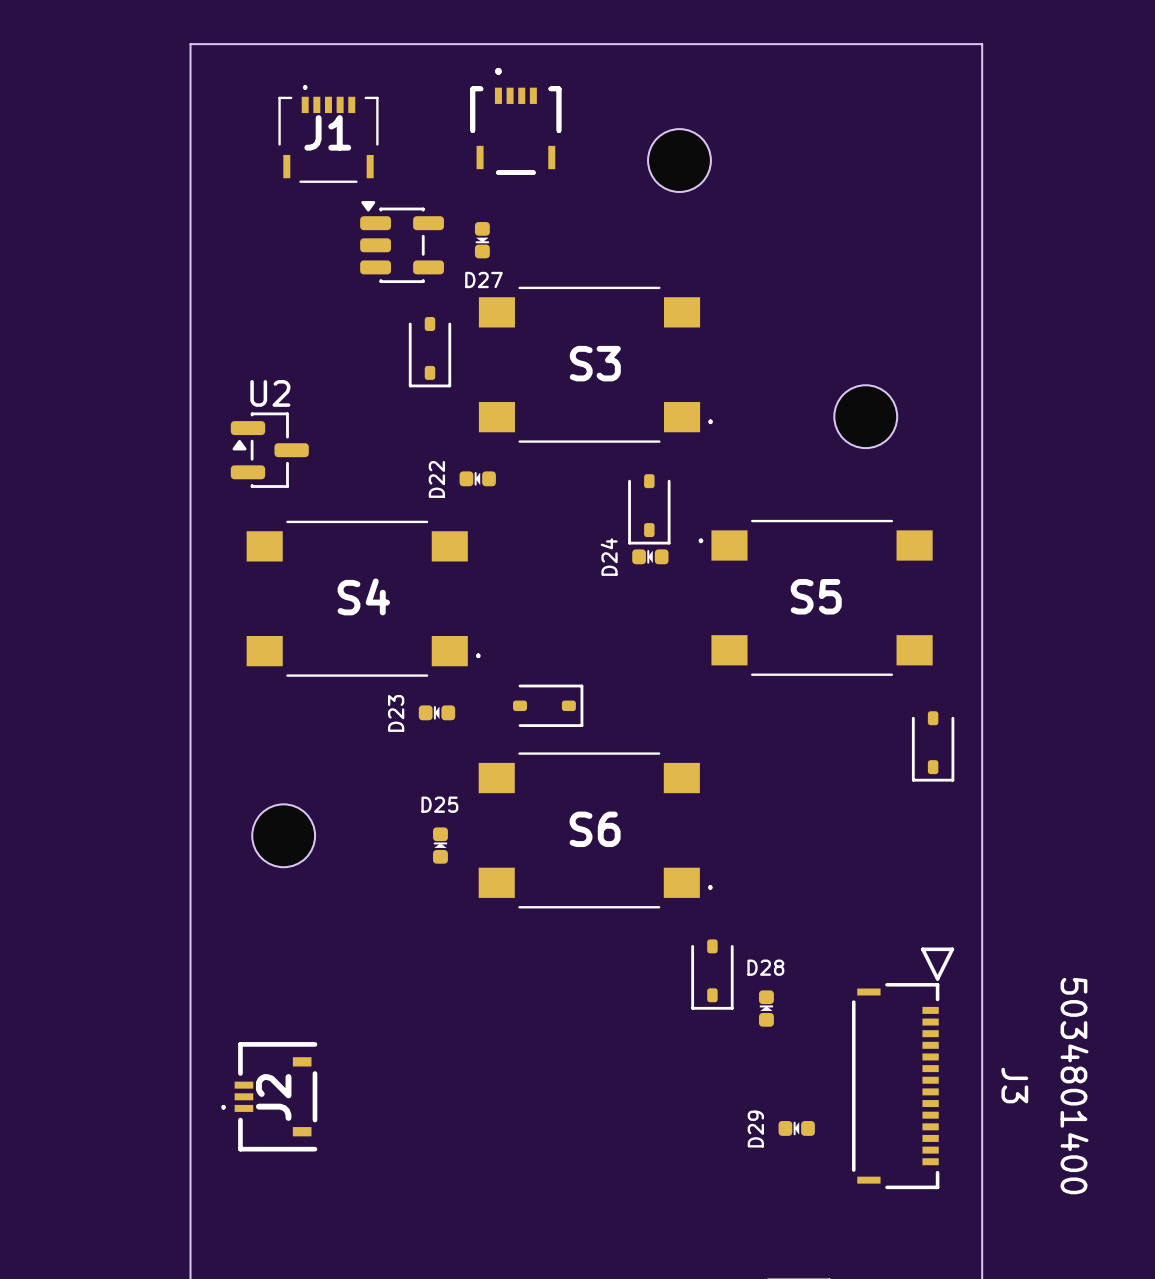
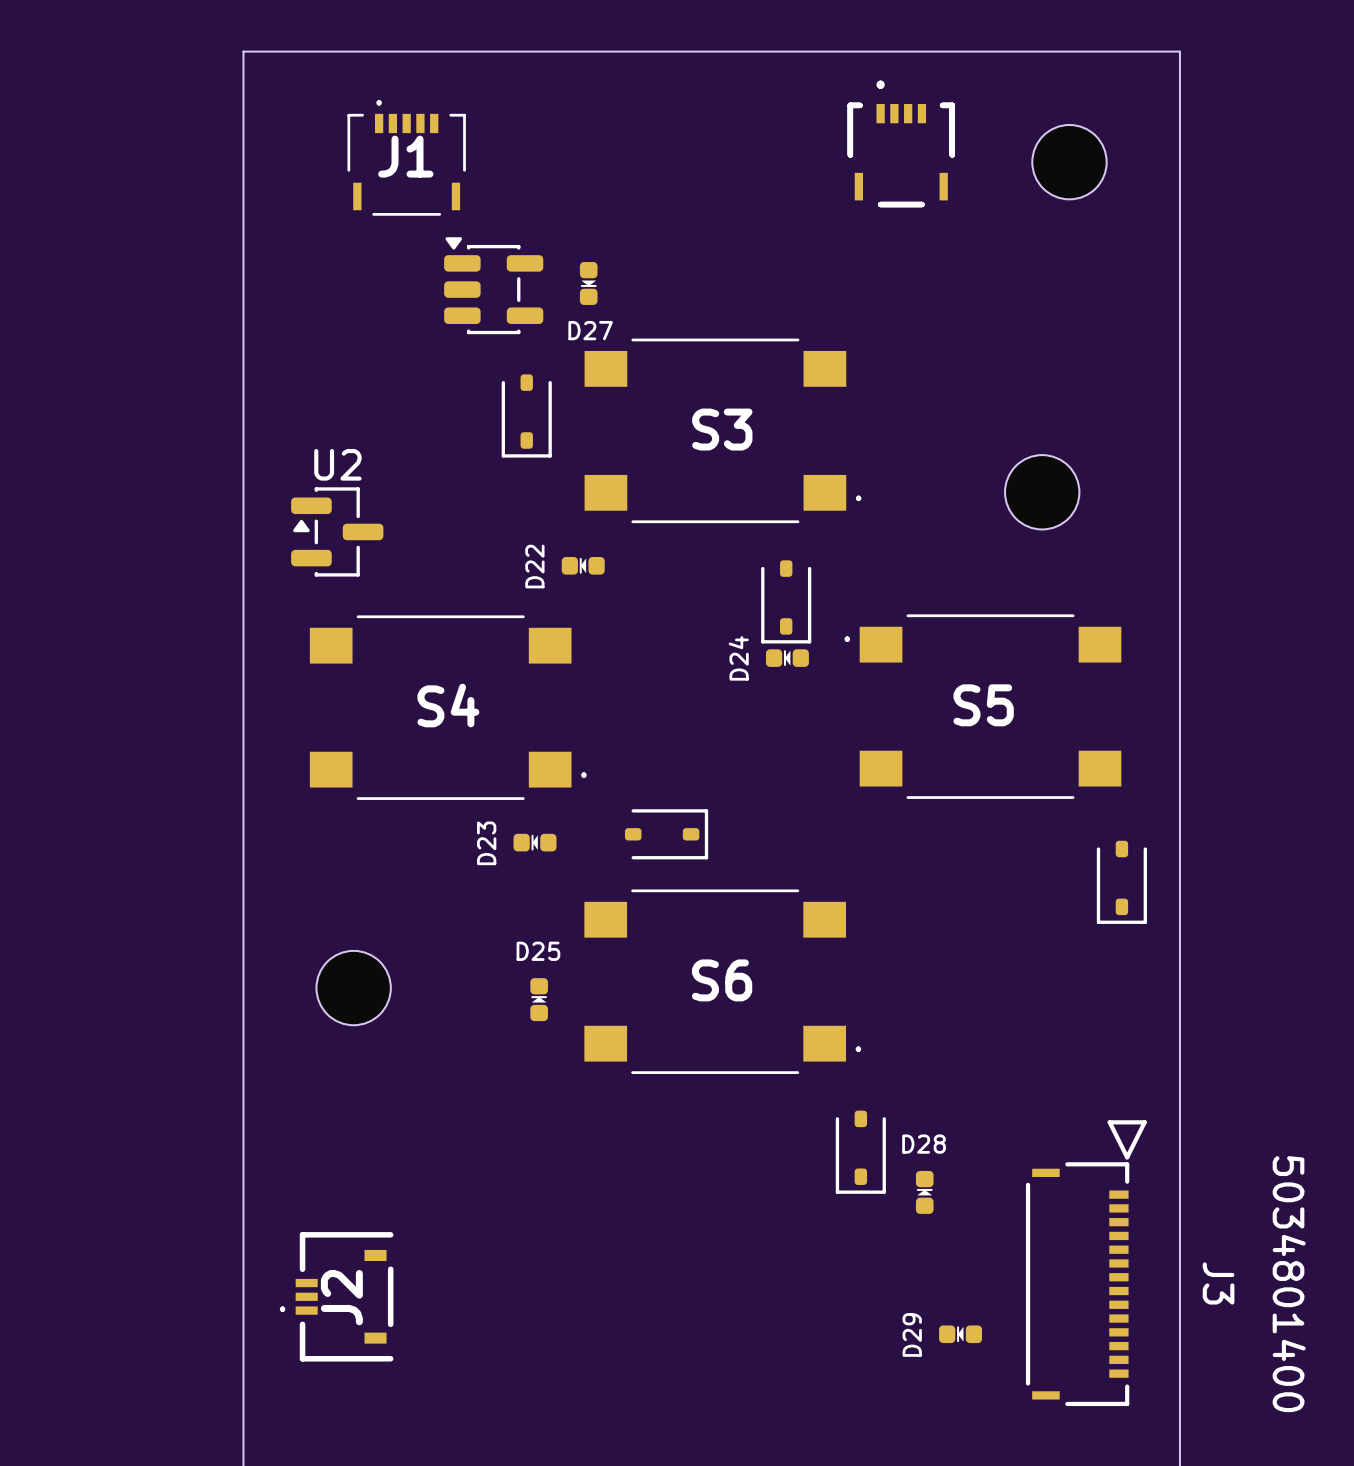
part position: (515, 121) -> (901, 143)
part position: (679, 160) -> (1069, 162)

